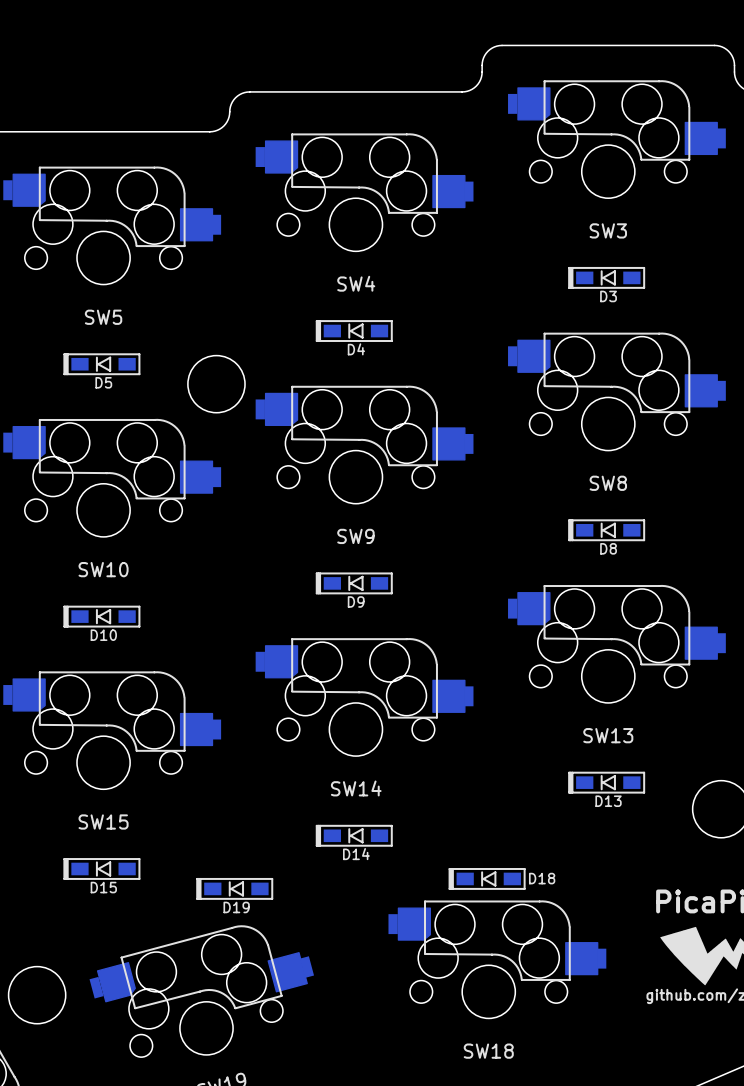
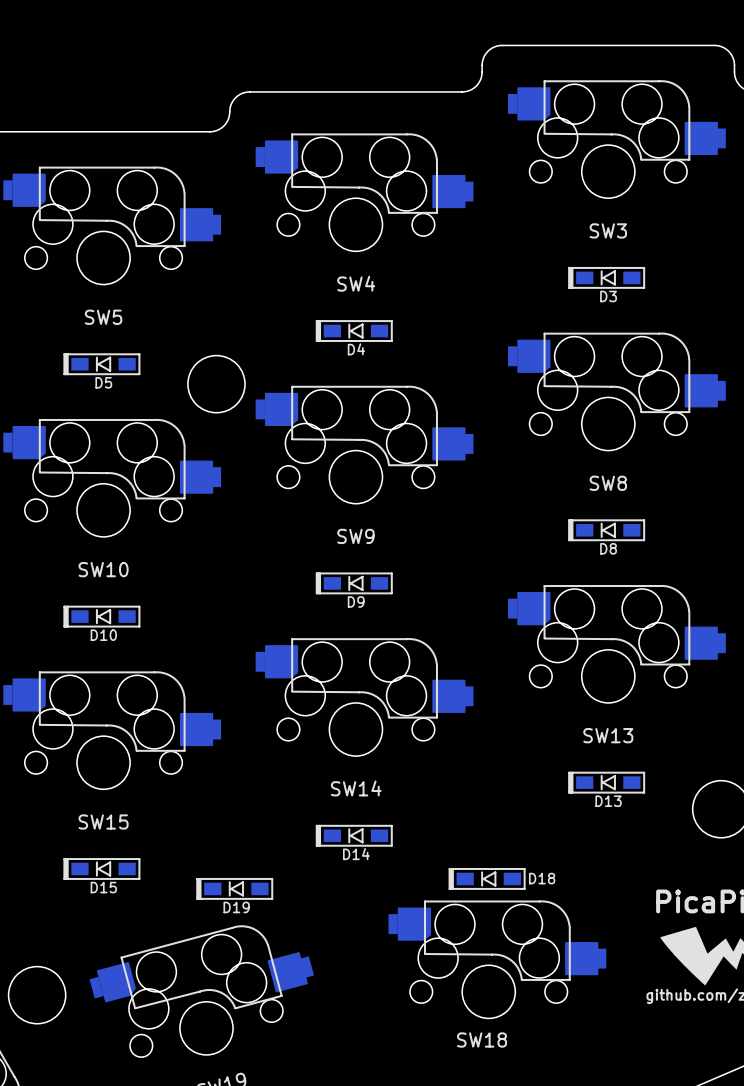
SW18 name position: SW18 (488, 1051) -> SW18 (482, 1040)

